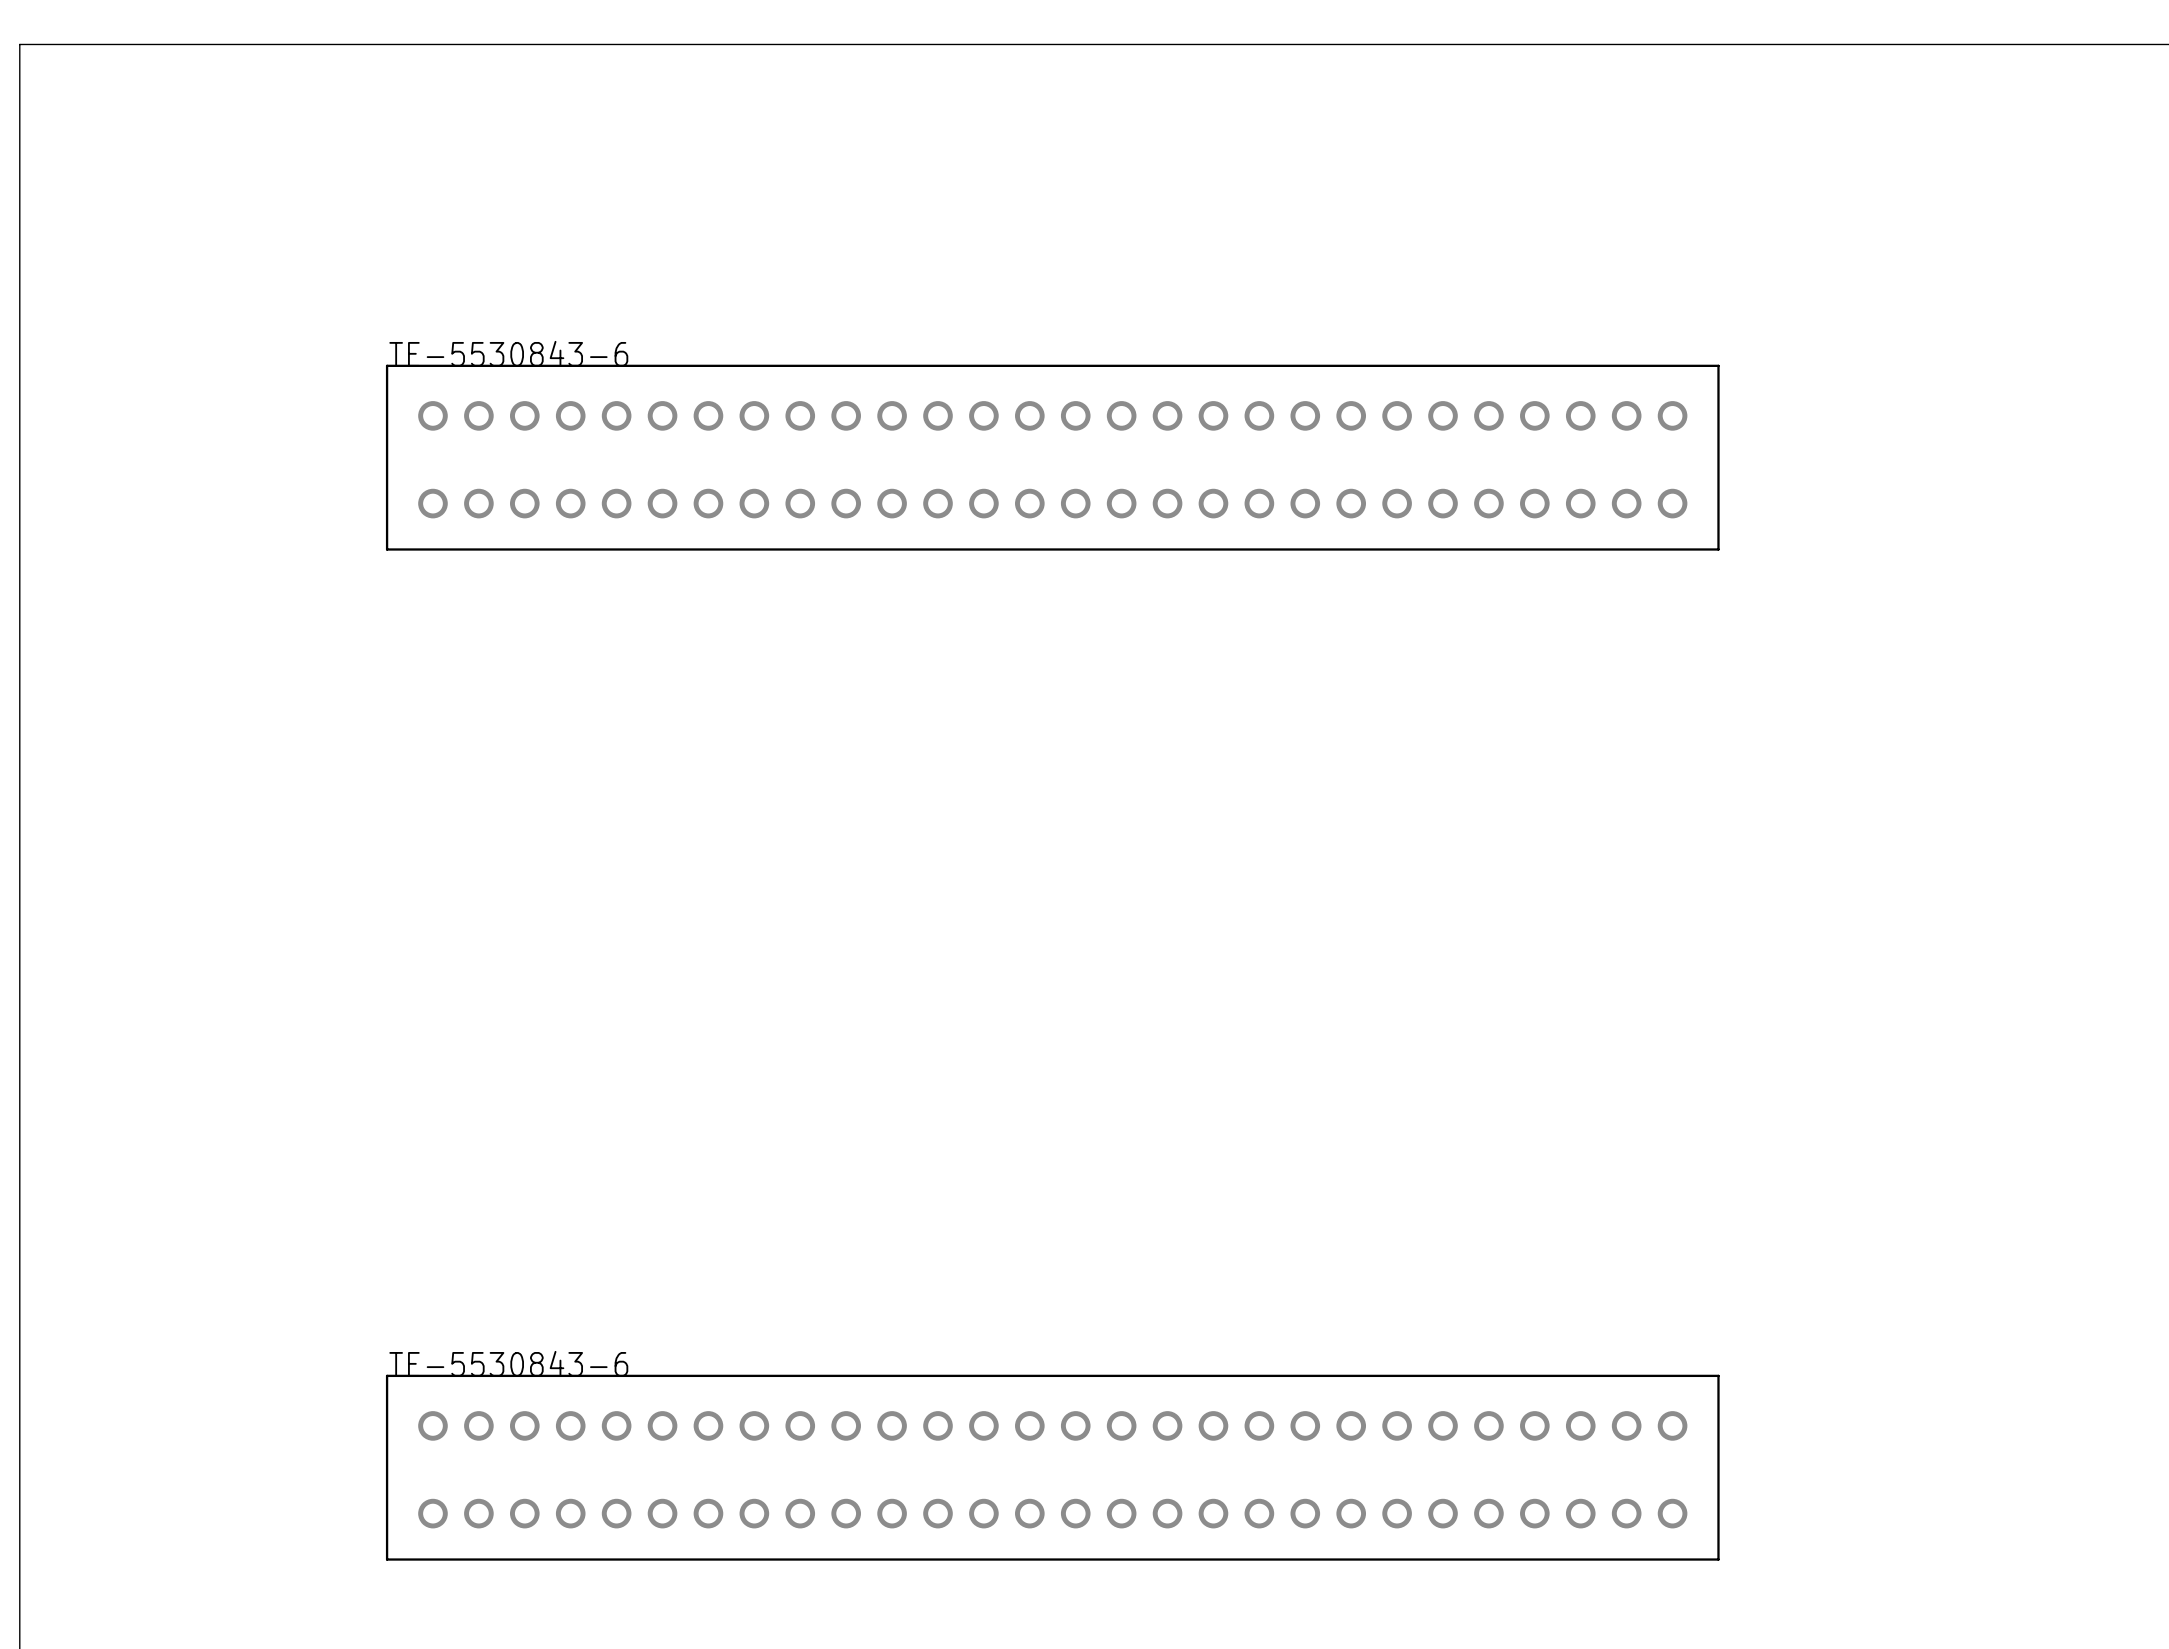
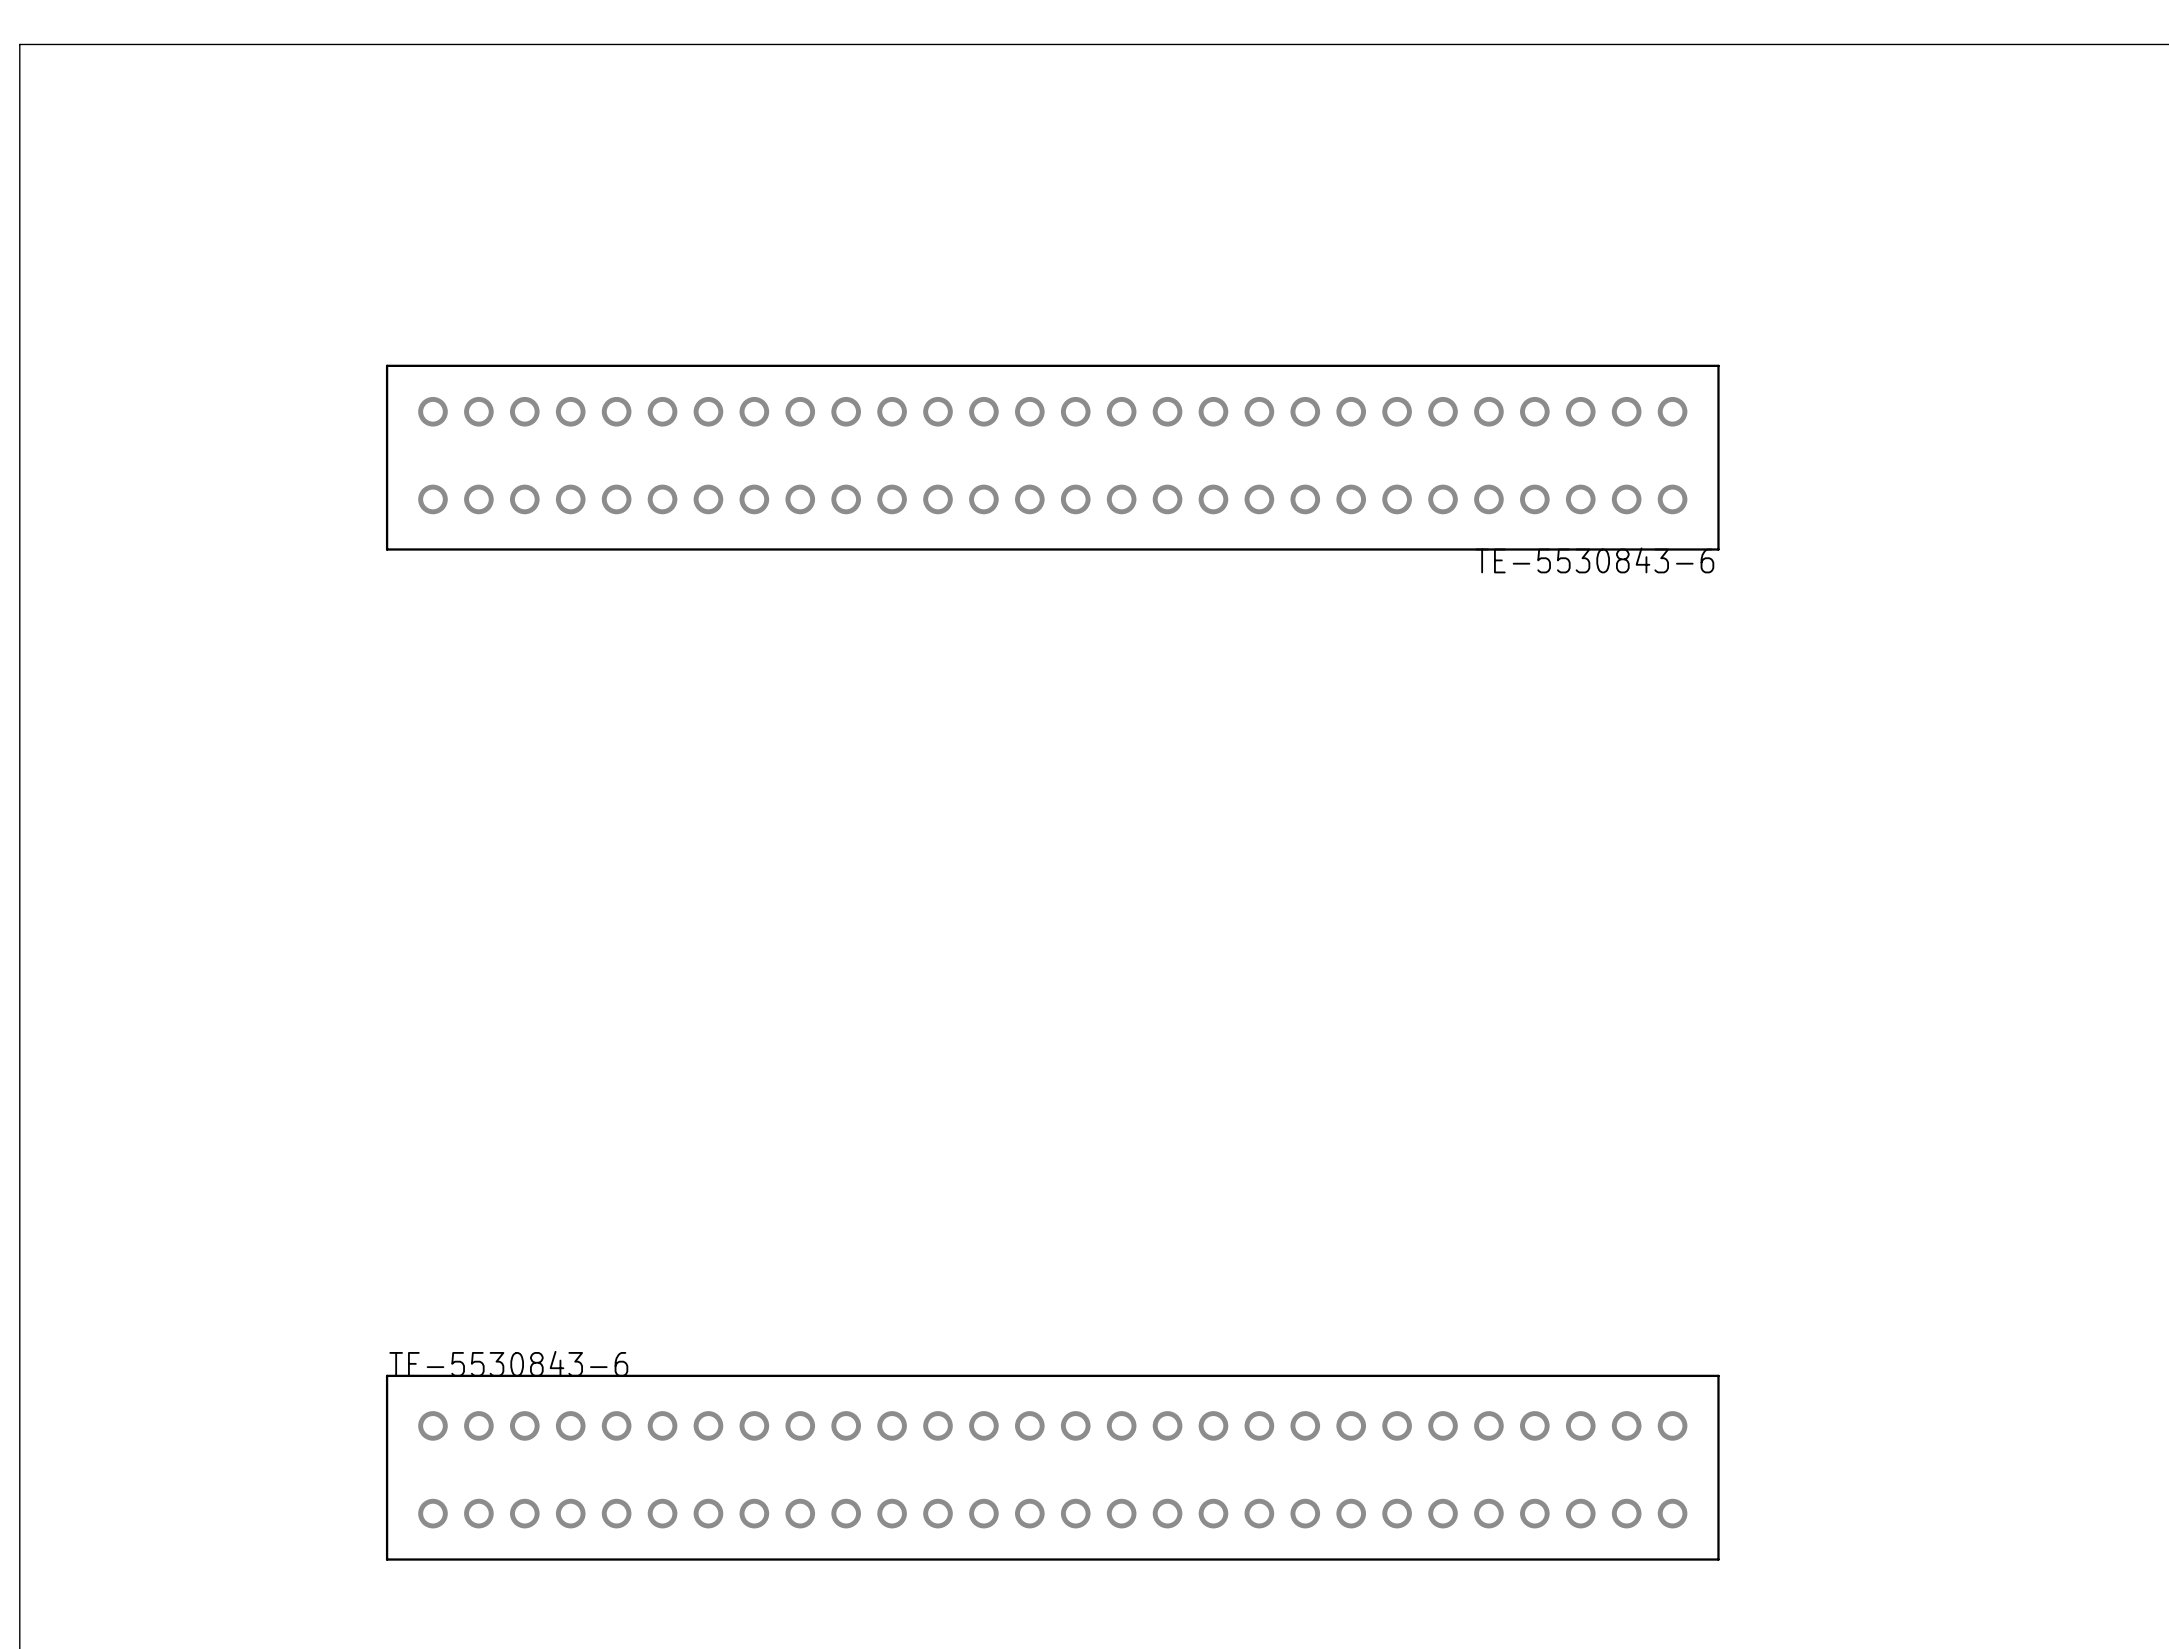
part footprint: [385, 364, 1720, 551] -> [385, 364, 1720, 551]

